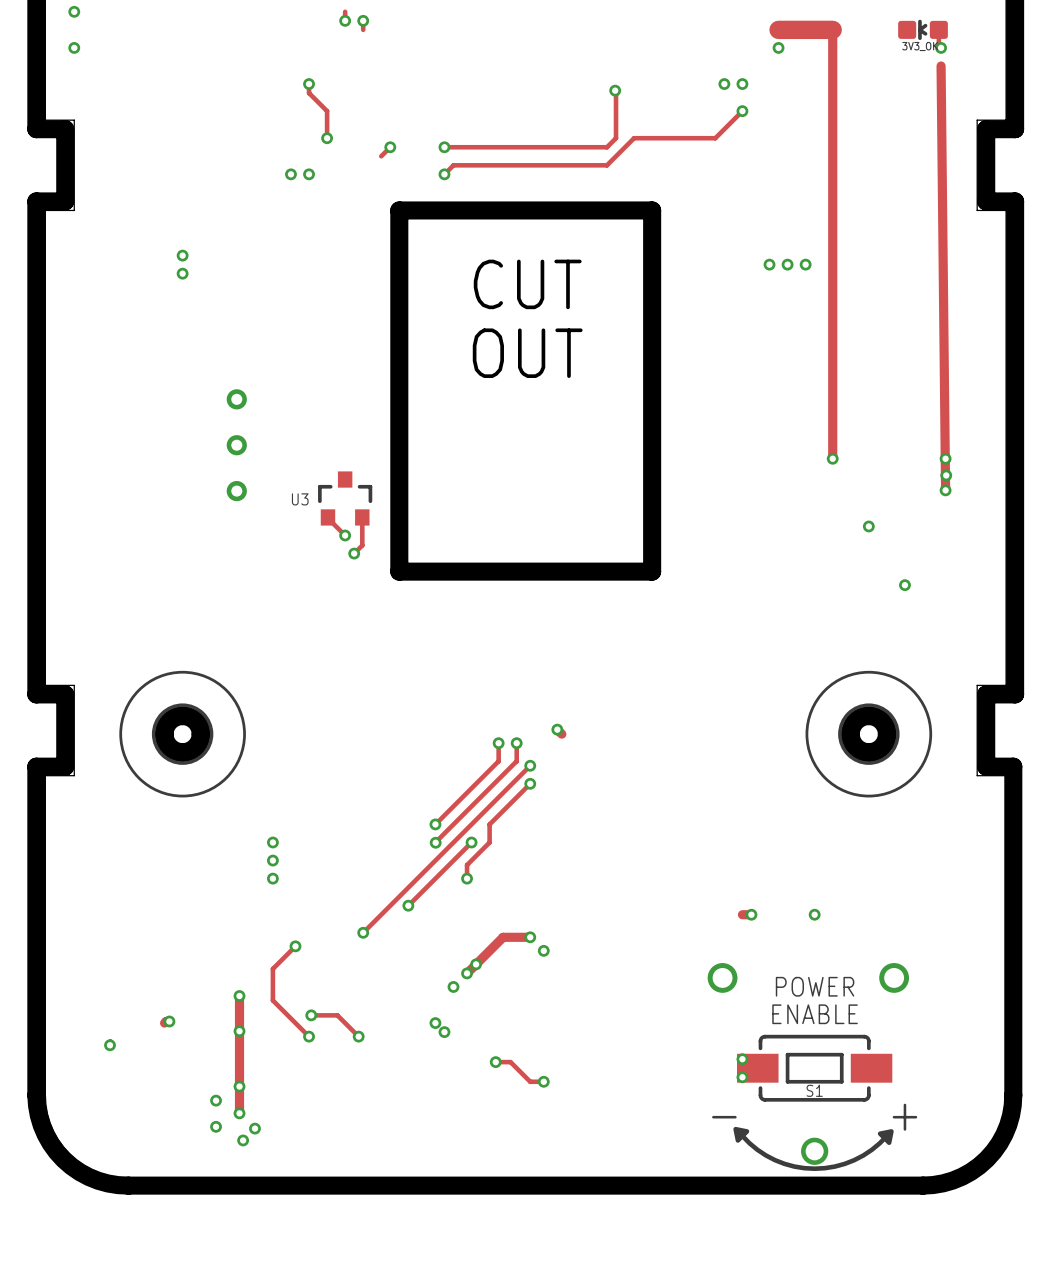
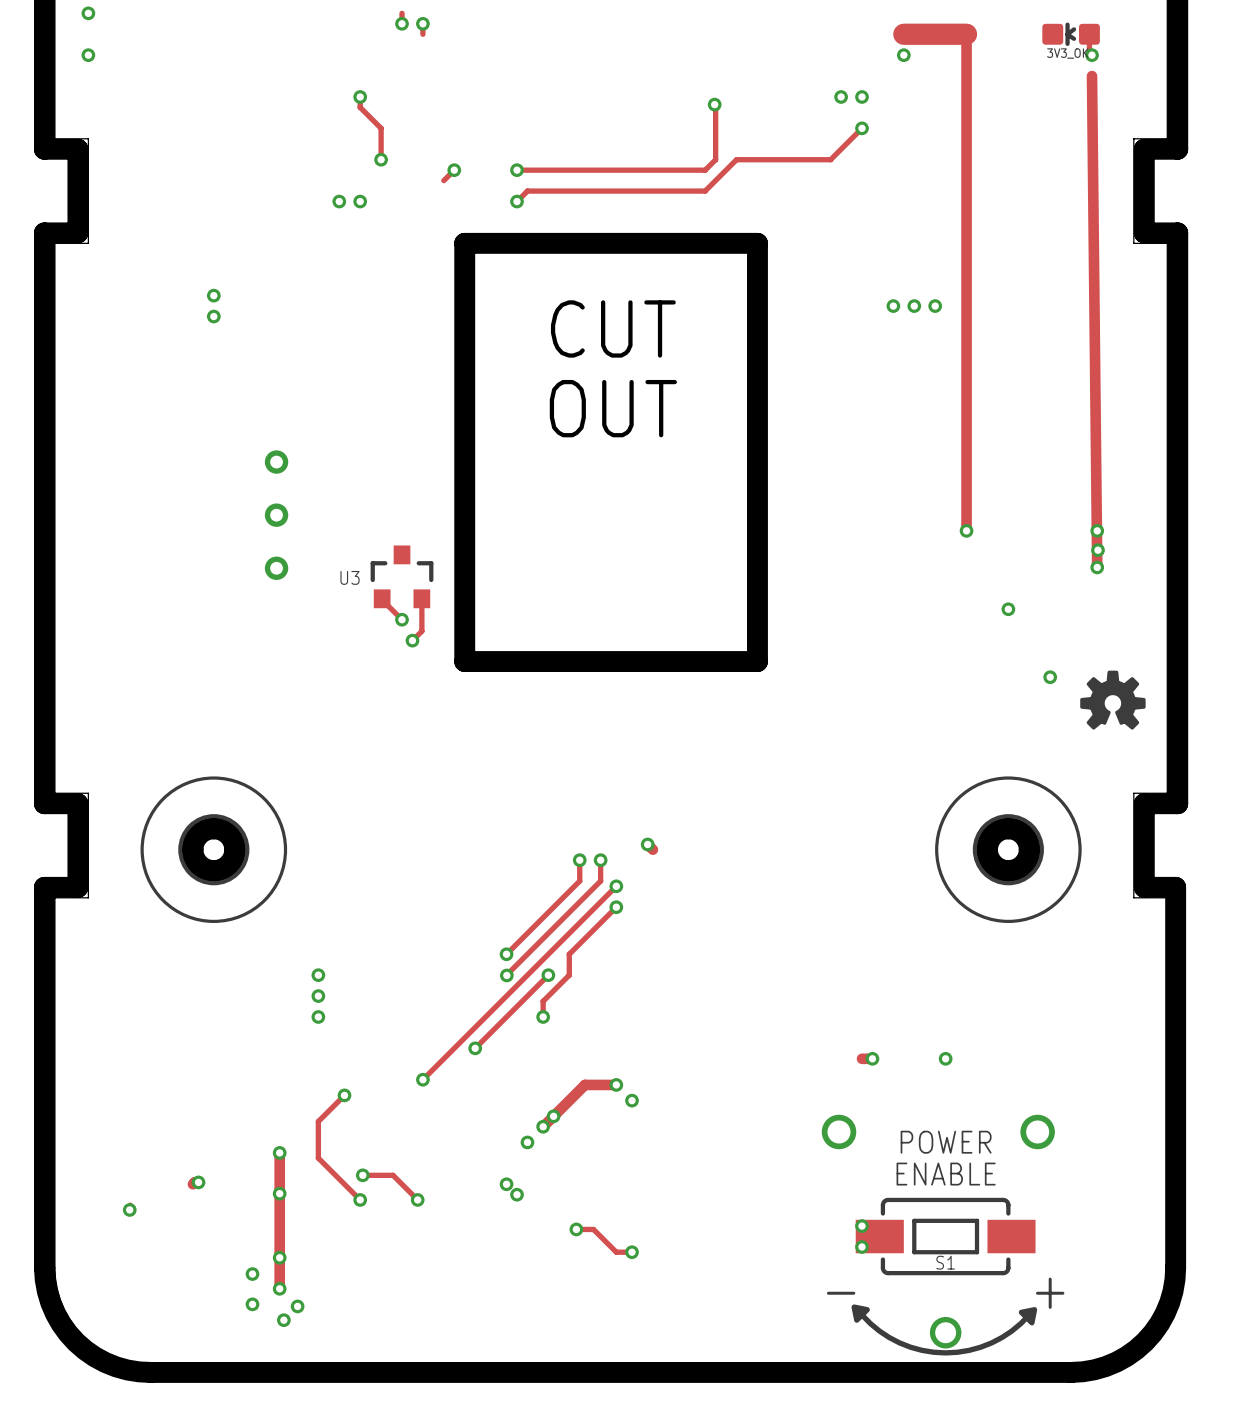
drawing: none -> [1080, 670, 1146, 730]

